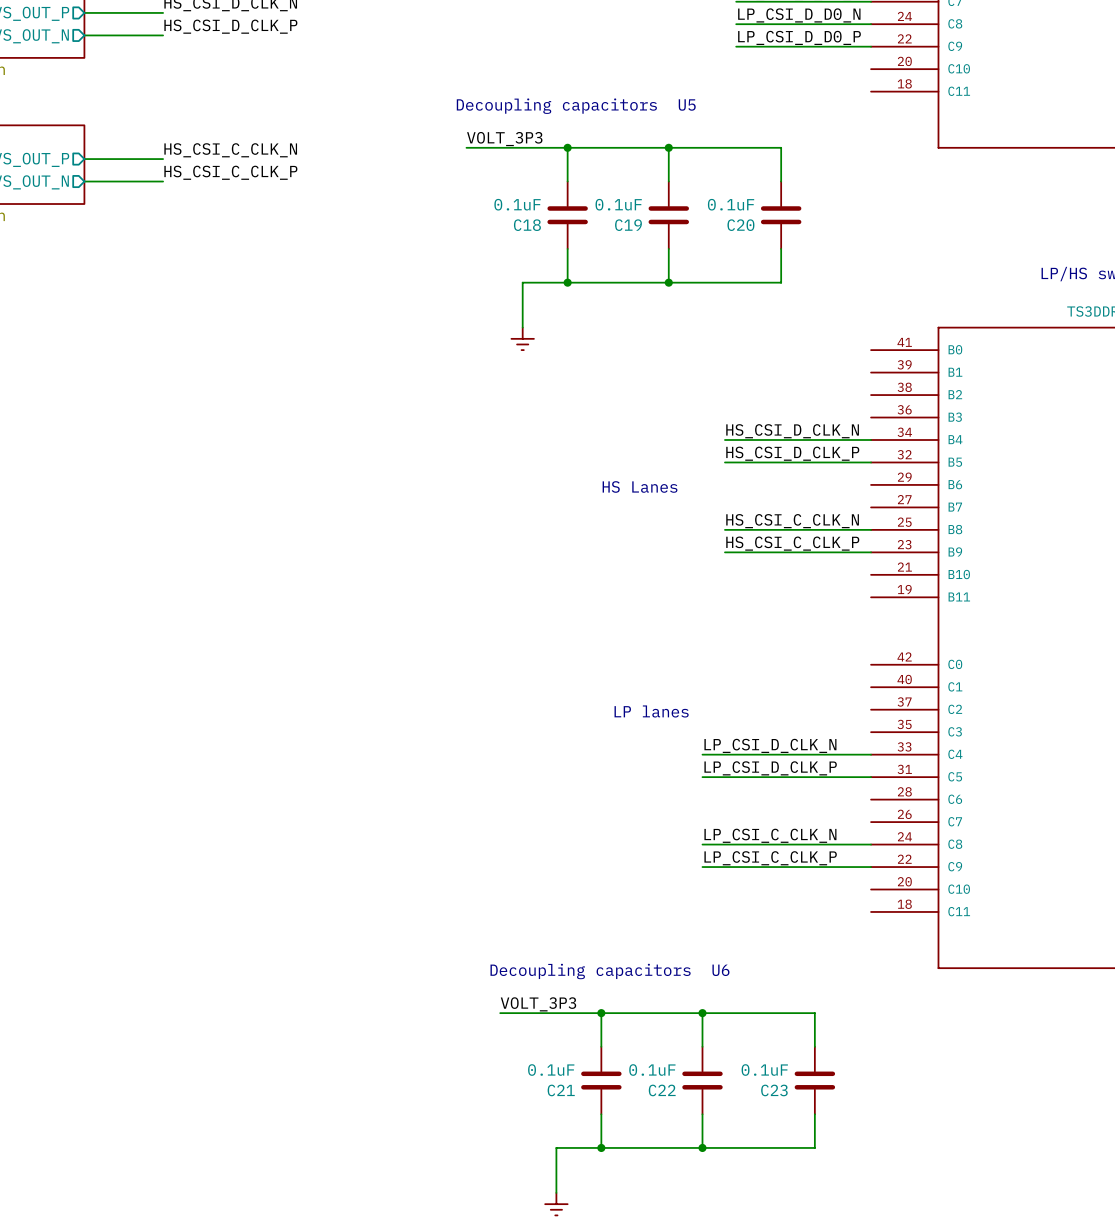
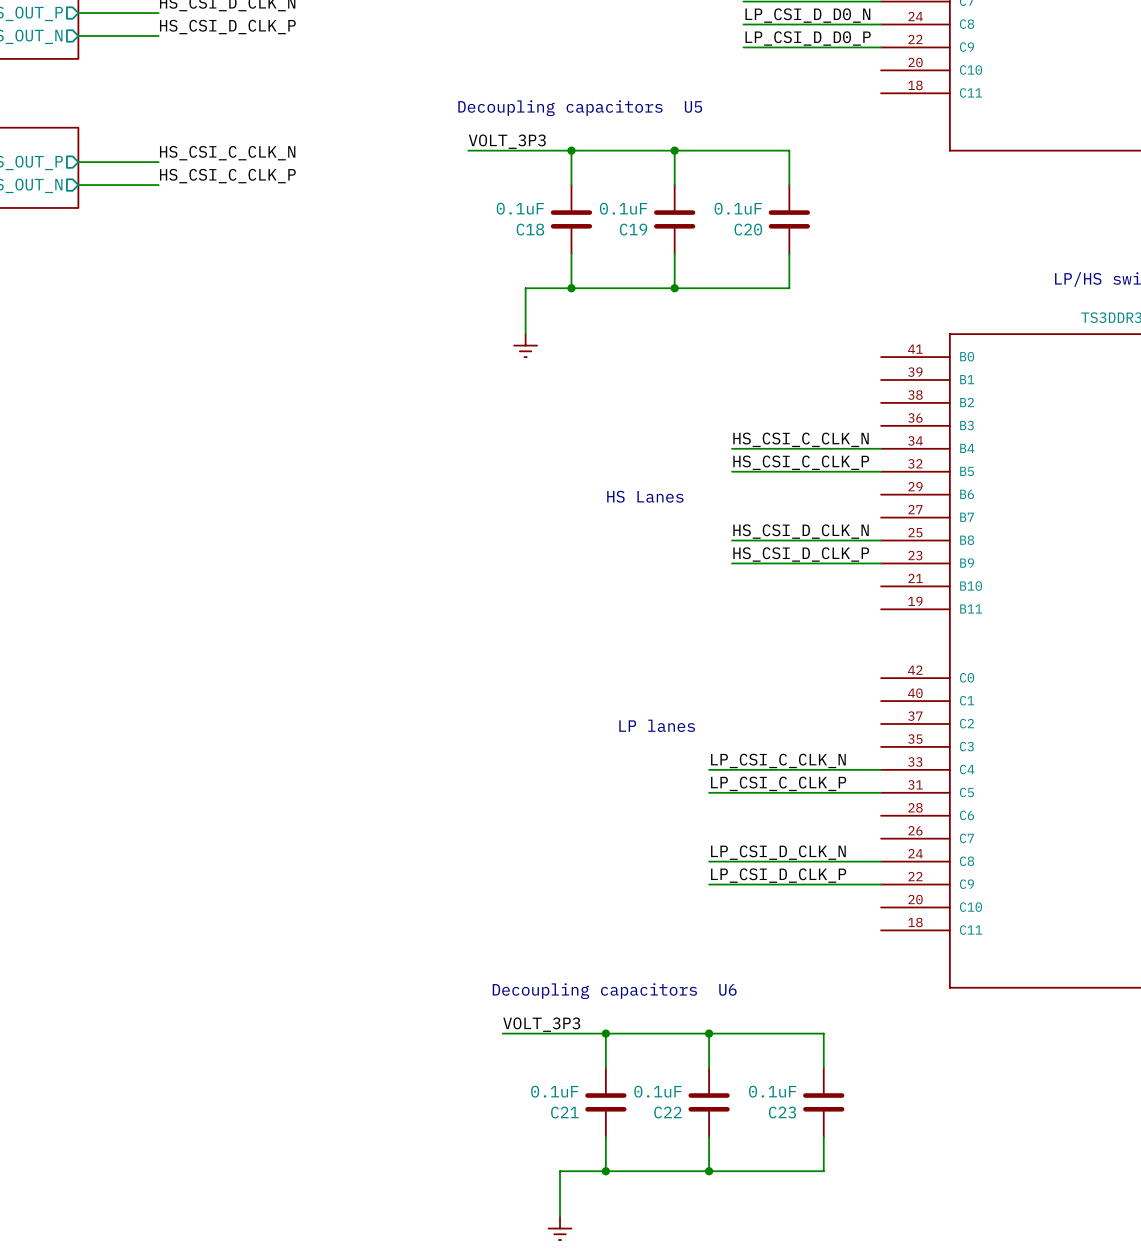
label: HS_CSI_D_CLK_N (792, 431) -> HS_CSI_C_CLK_N (801, 439)
label: HS_CSI_D_CLK_P (792, 453) -> HS_CSI_C_CLK_P (801, 462)
label: HS_CSI_C_CLK_N (792, 521) -> HS_CSI_D_CLK_N (801, 531)
label: HS_CSI_C_CLK_P (792, 543) -> HS_CSI_D_CLK_P (801, 554)
label: LP_CSI_D_CLK_N (770, 745) -> LP_CSI_C_CLK_N (778, 760)
label: LP_CSI_D_CLK_P (770, 768) -> LP_CSI_C_CLK_P (778, 783)
label: LP_CSI_C_CLK_N (770, 835) -> LP_CSI_D_CLK_N (778, 852)
label: LP_CSI_C_CLK_P (770, 858) -> LP_CSI_D_CLK_P (778, 875)

